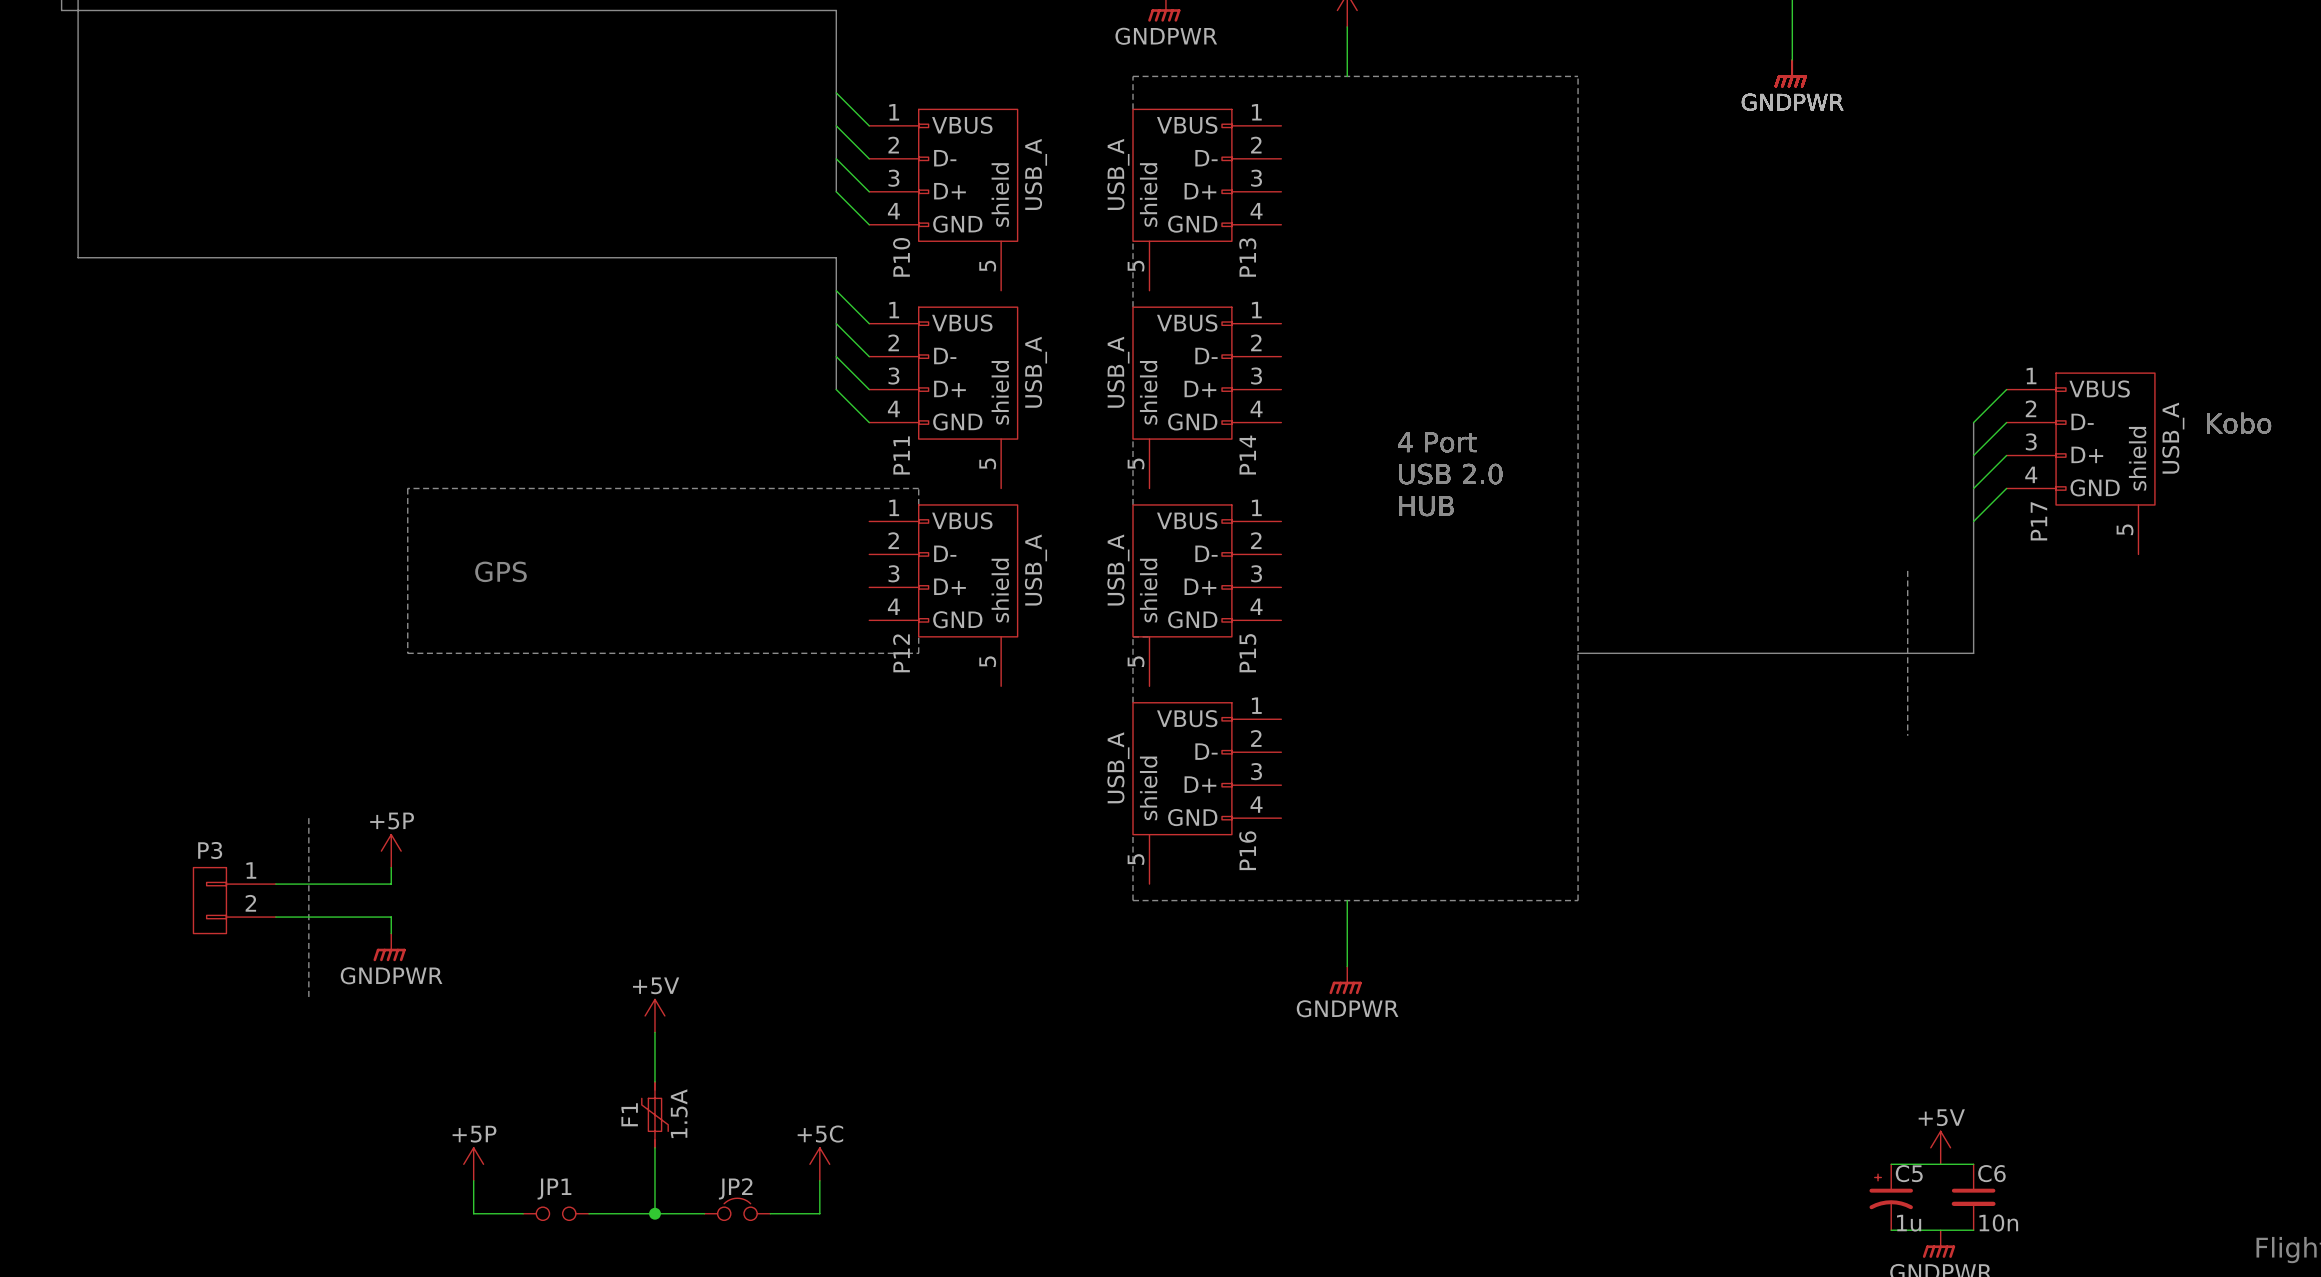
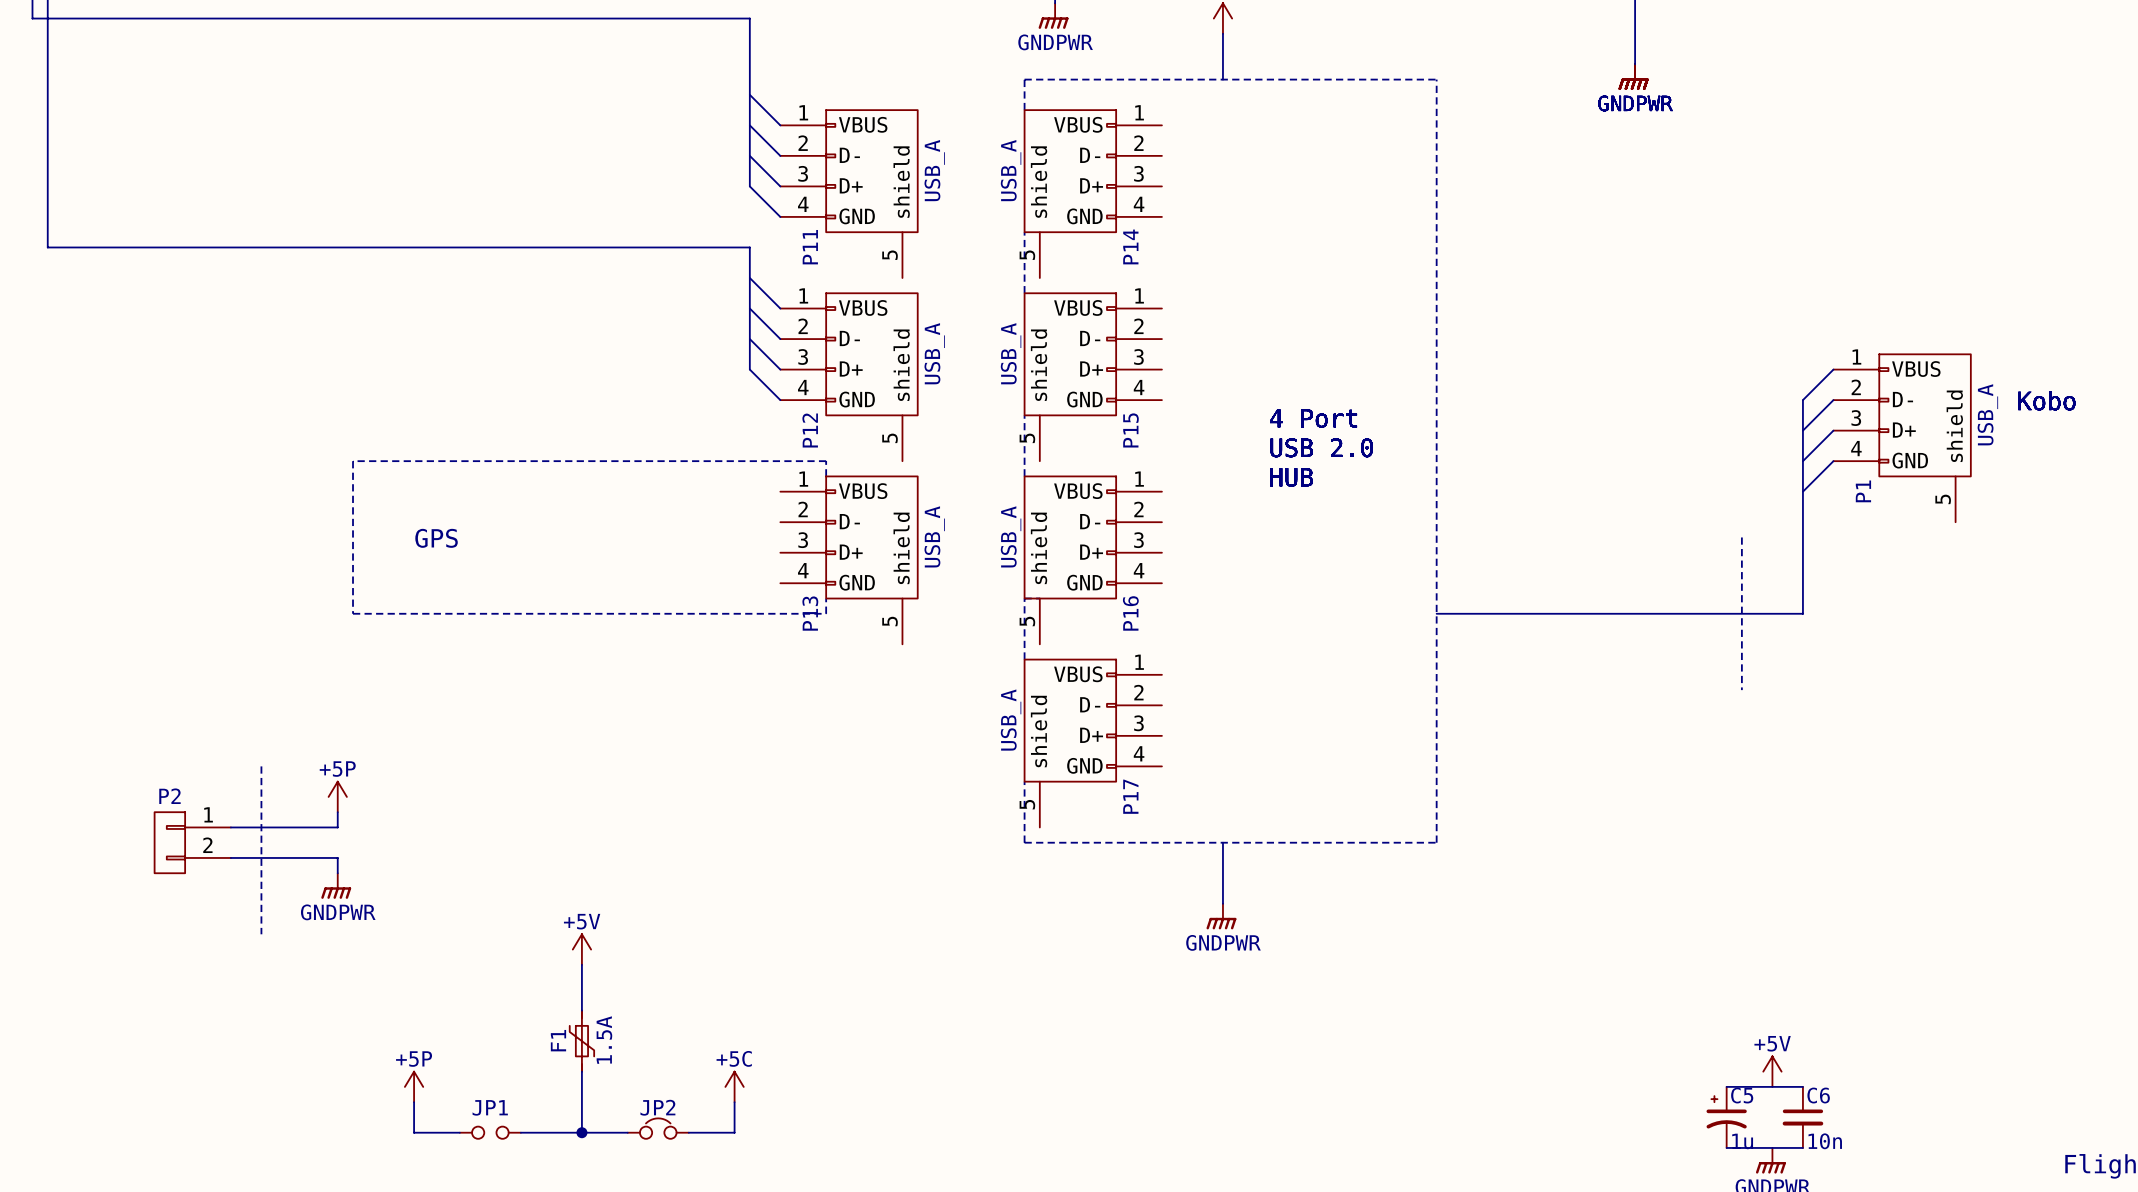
P10 name: P10 (901, 257) -> P11 (810, 247)
P13 name: P13 (1247, 257) -> P14 (1130, 246)
P11 name: P11 (901, 455) -> P12 (810, 430)
P14 name: P14 (1247, 455) -> P15 (1130, 430)
P17 name: P17 (2038, 521) -> P1 (1863, 491)
P12 name: P12 (901, 653) -> P13 (810, 613)
P15 name: P15 (1247, 653) -> P16 (1130, 613)
P3 name: P3 (210, 850) -> P2 (169, 796)
P16 name: P16 (1247, 850) -> P17 (1130, 796)

